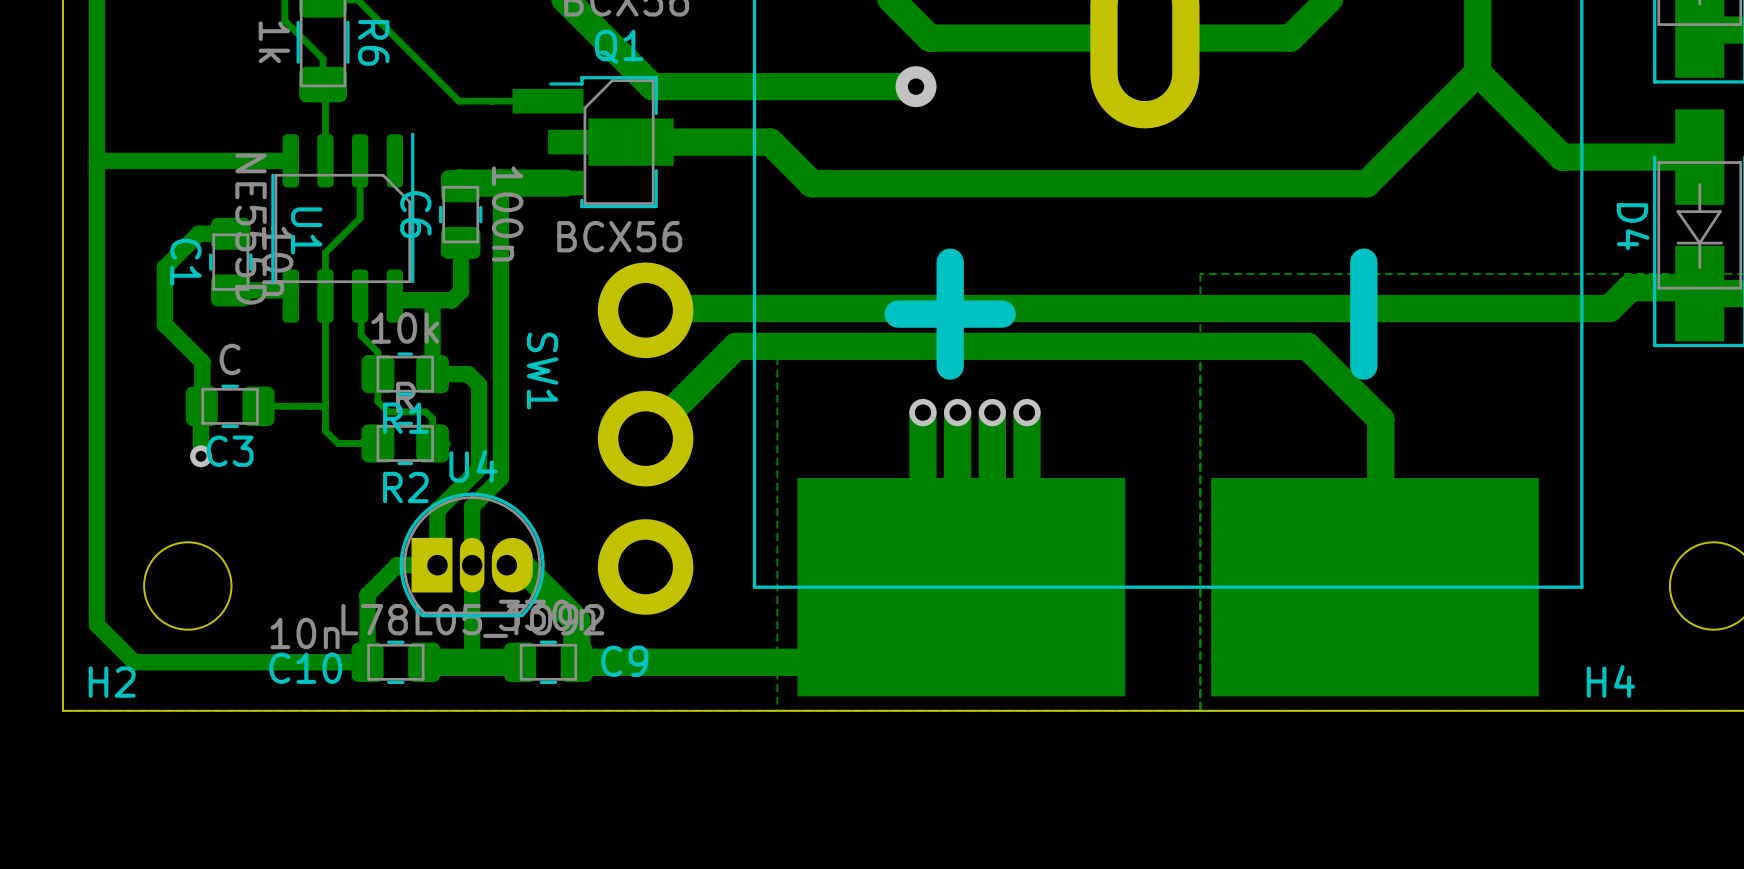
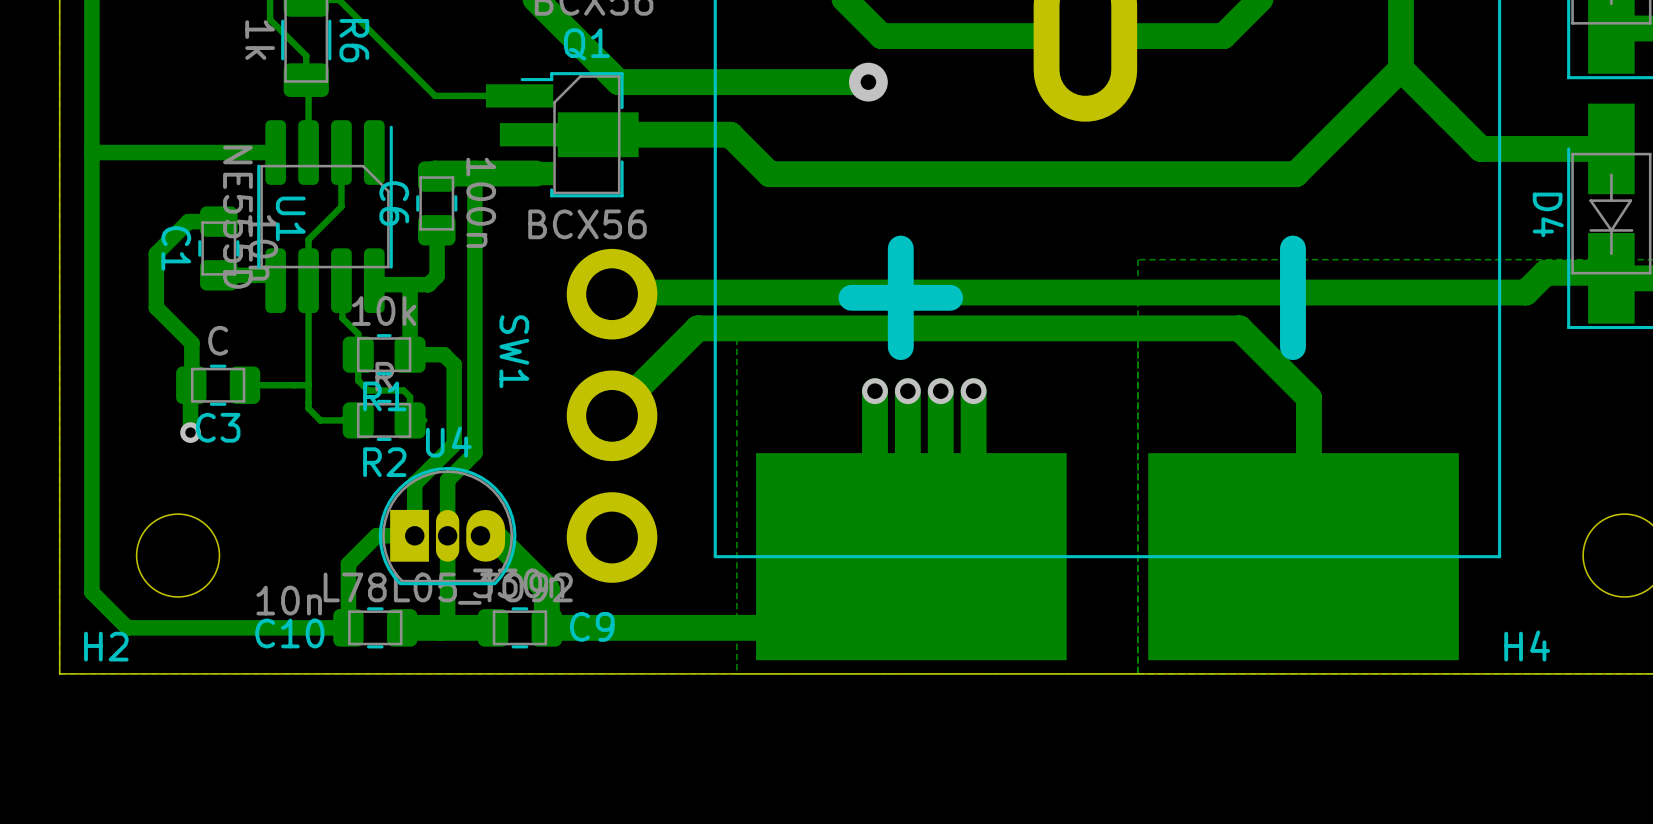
Q1 footprint: [512, 76, 674, 209] -> [485, 72, 639, 198]
U1 footprint: [271, 132, 415, 323] -> [257, 120, 393, 314]

